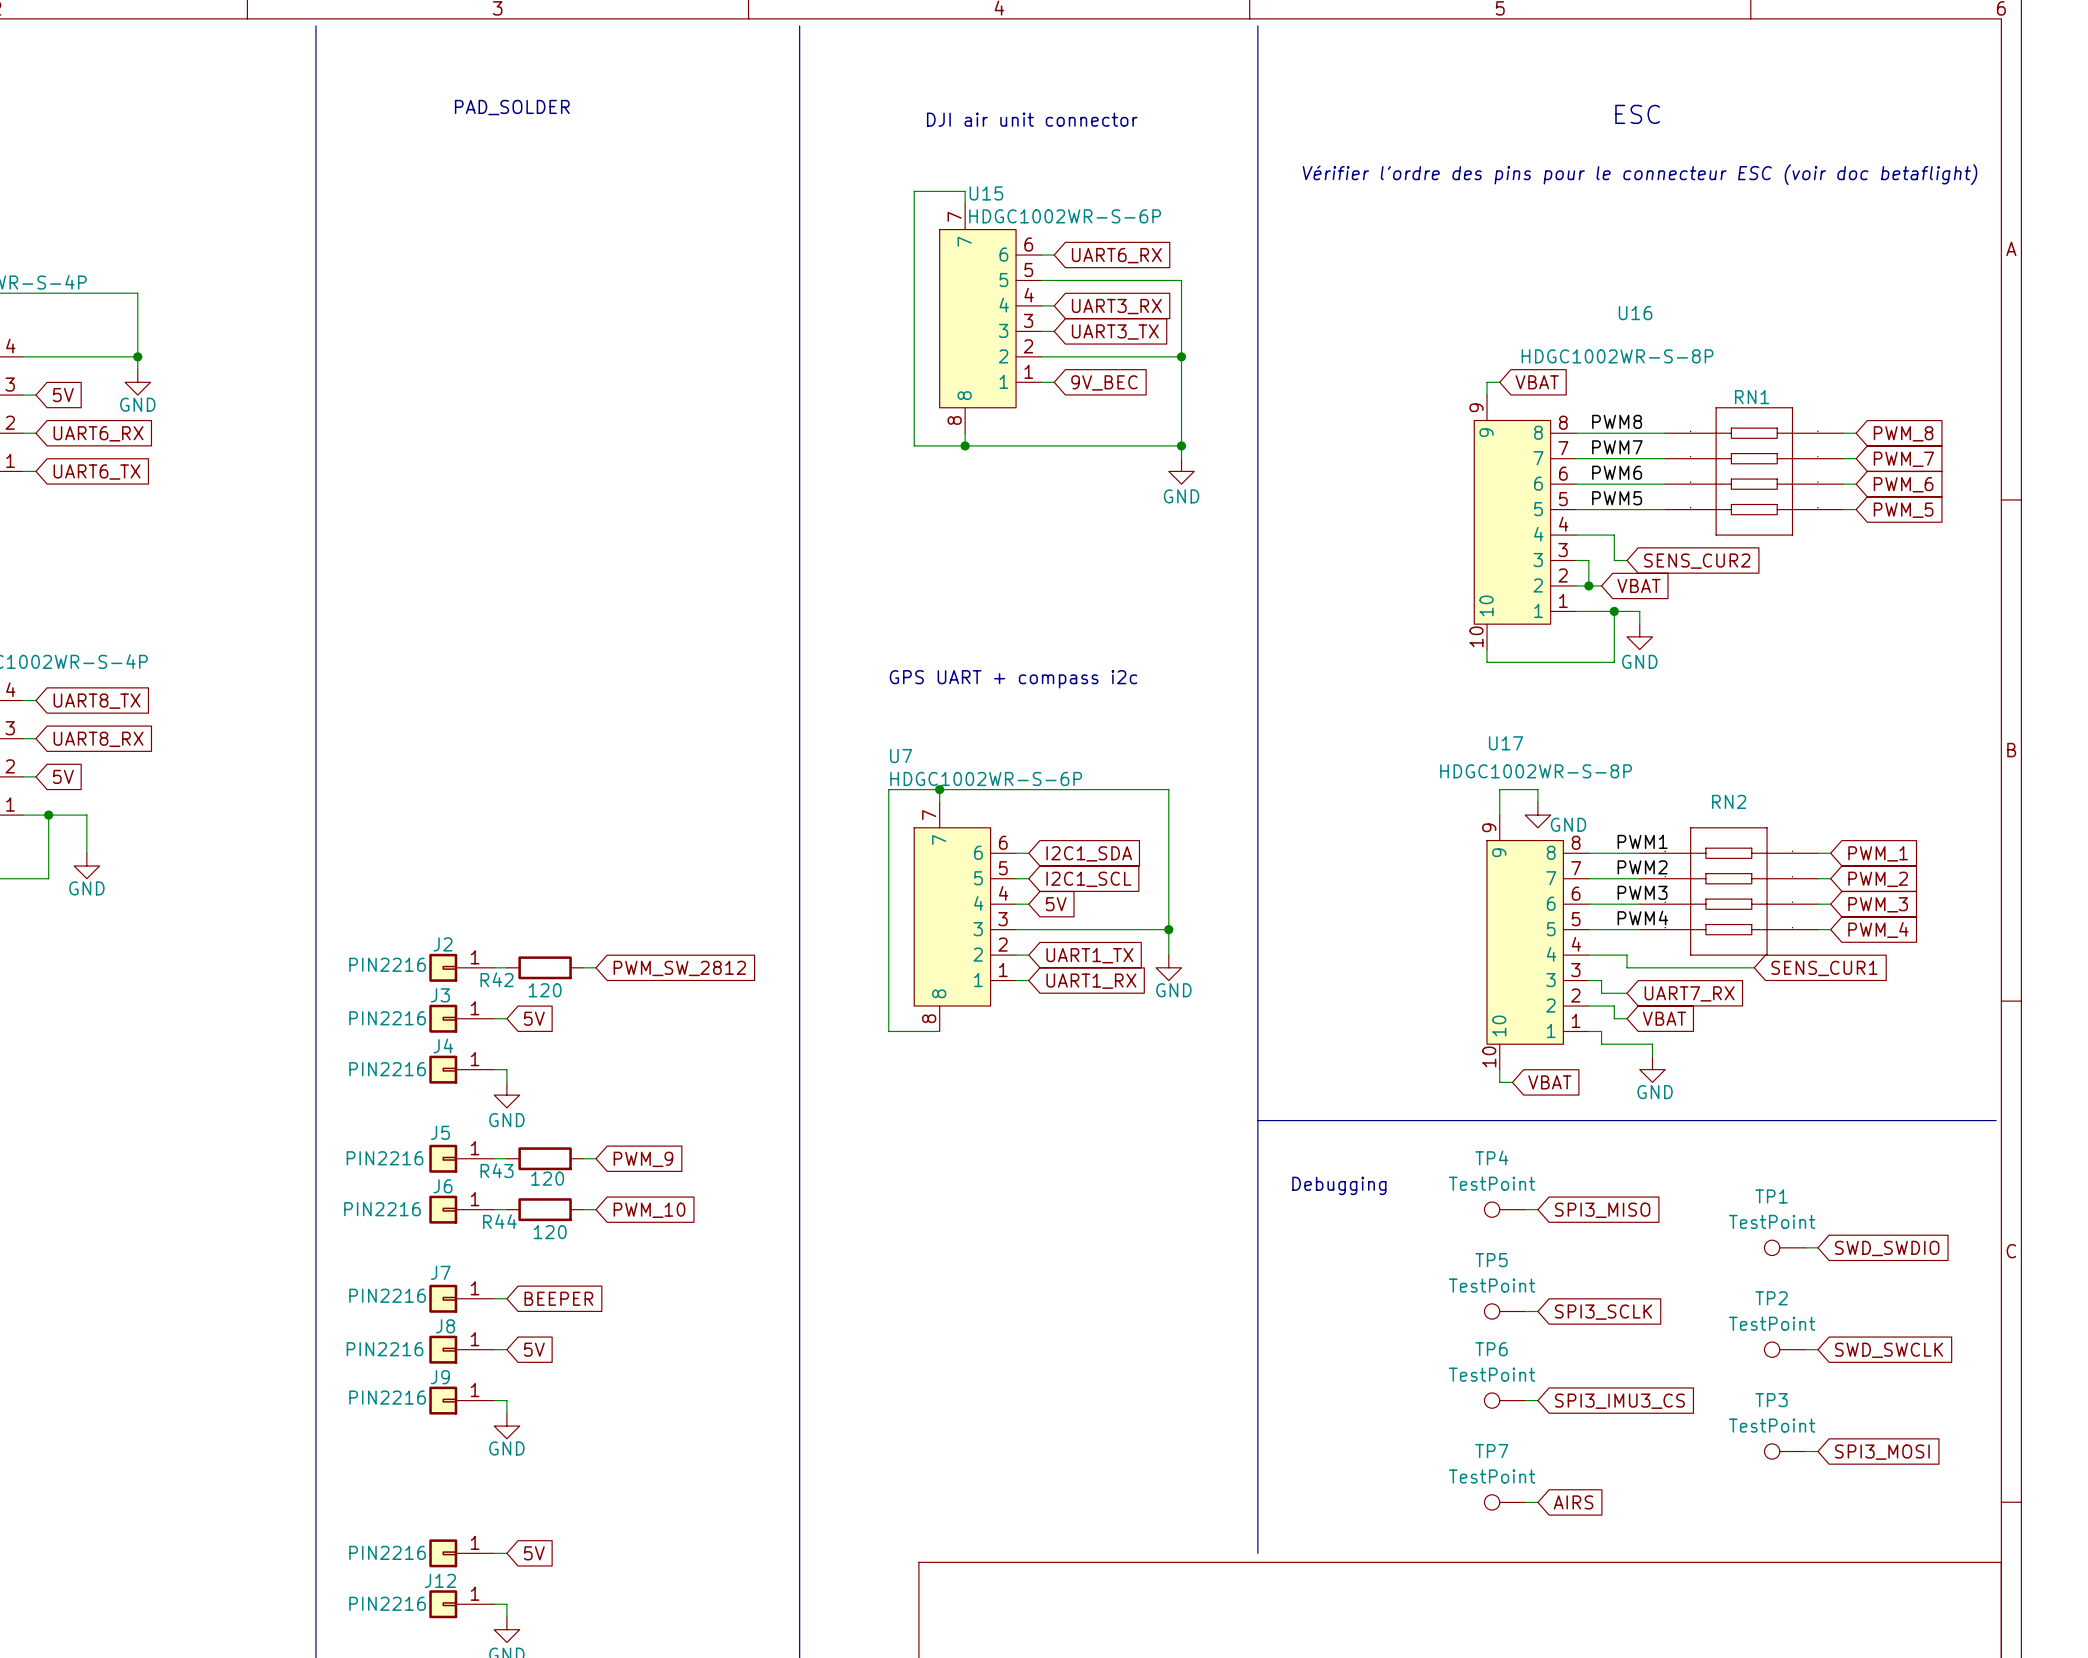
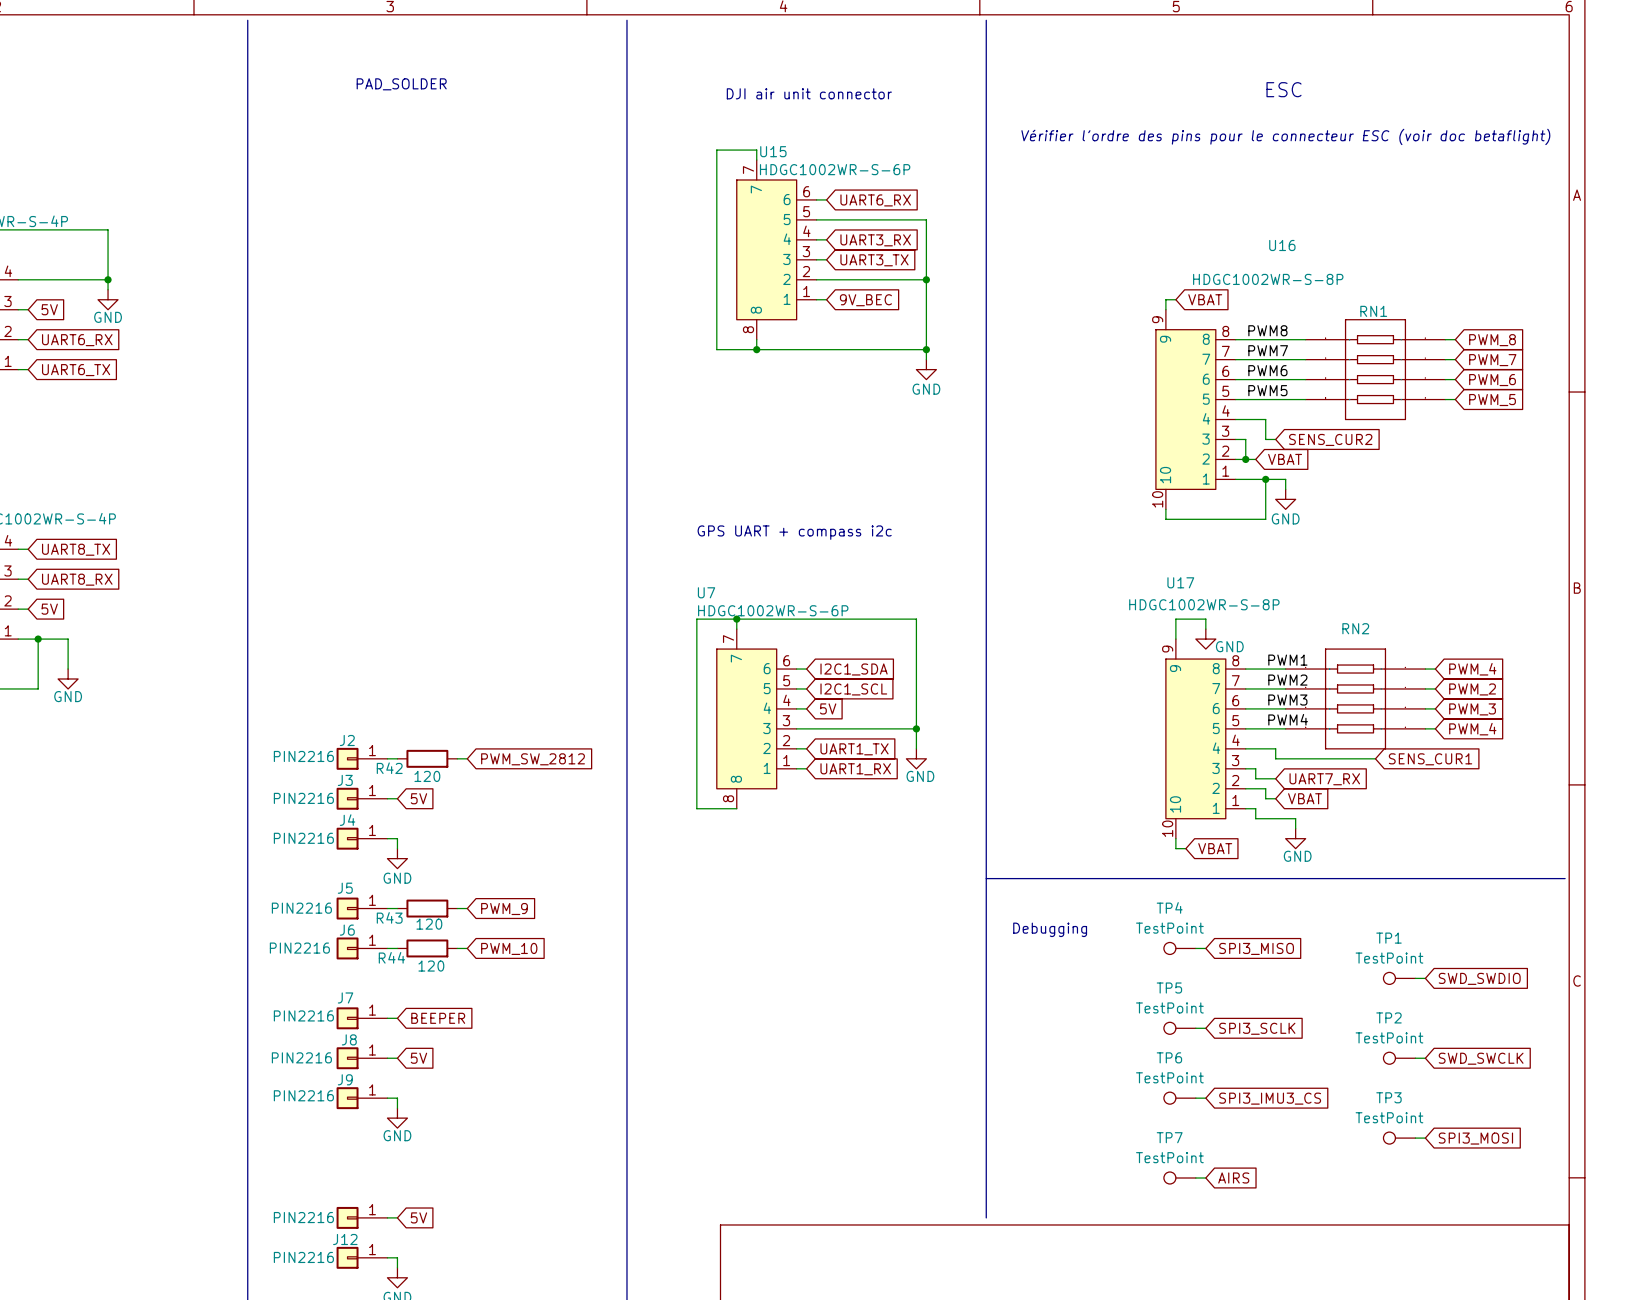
global label: PWM_1 (1878, 853) -> PWM_4 (1472, 669)

